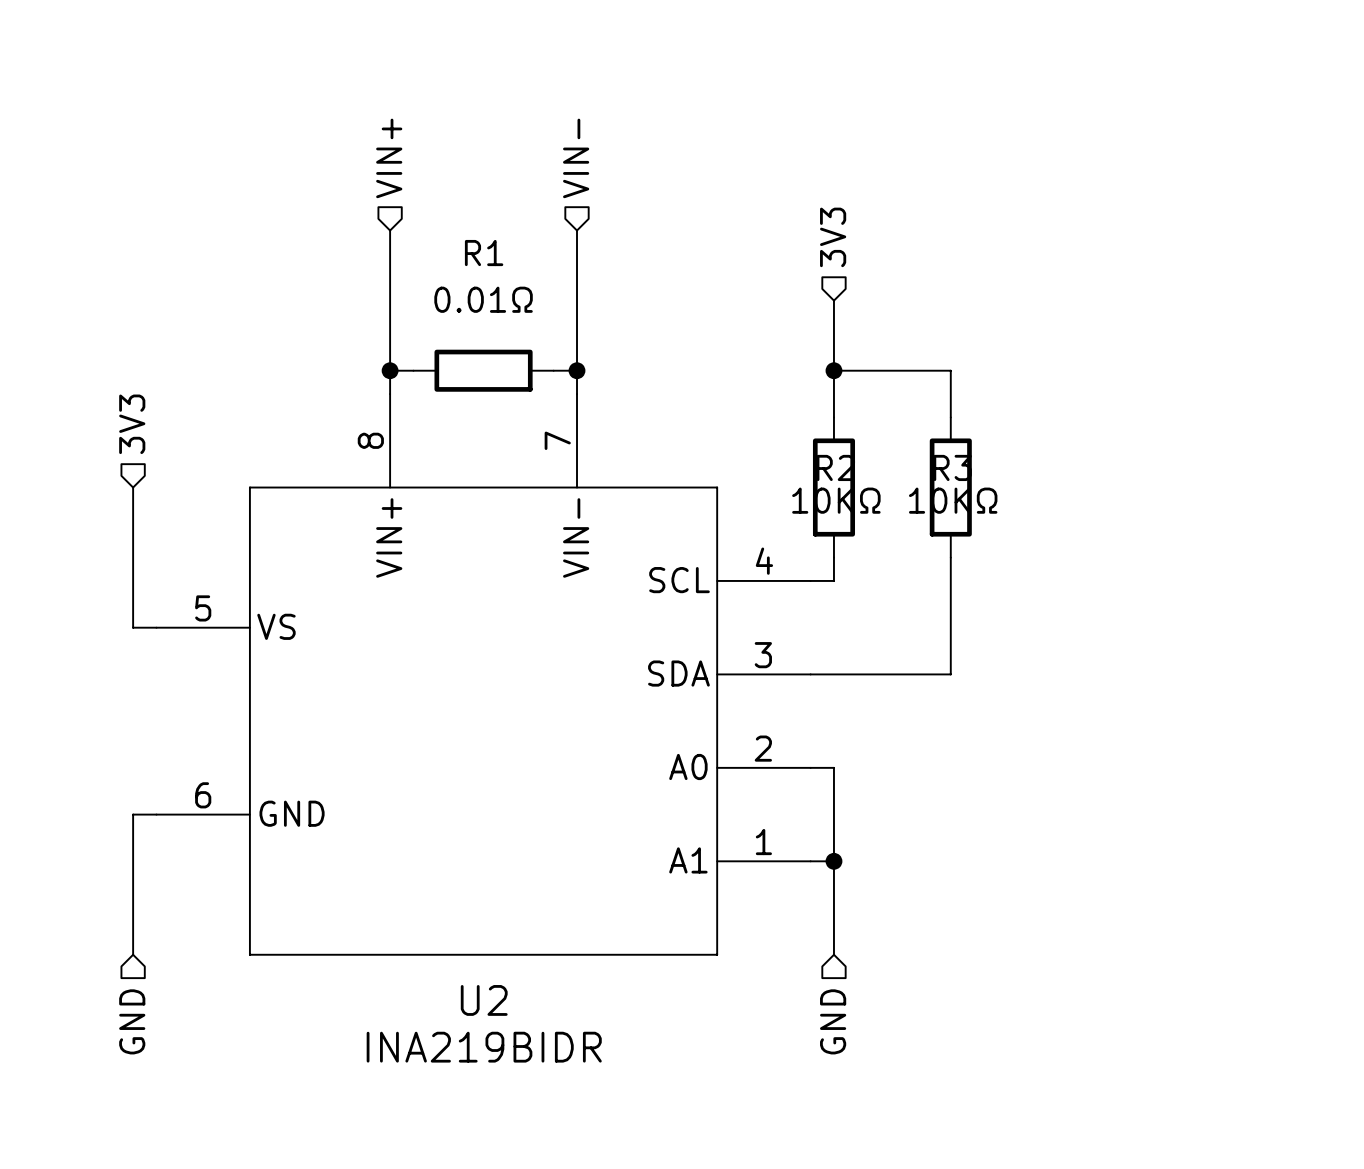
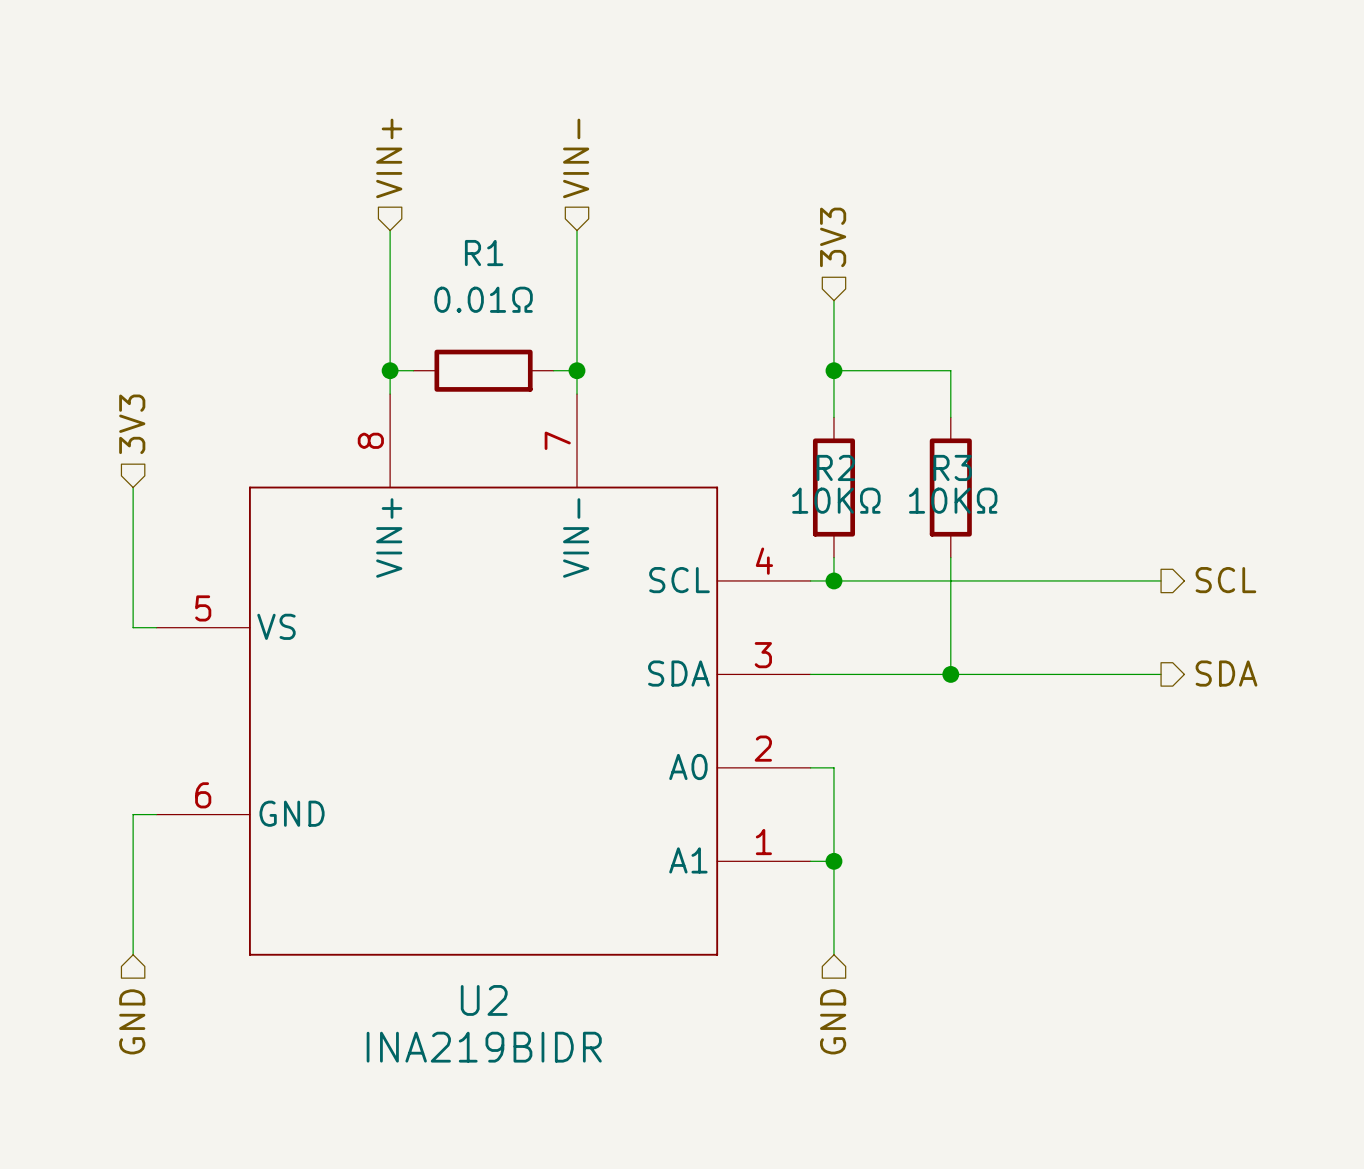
wire: none -> (833, 580) (1161, 580)
junction: none -> (833, 580)
hierarchical label: none -> SCL (1225, 580)
hierarchical label: none -> SDA (1226, 673)
wire: none -> (950, 674) (1161, 674)
junction: none -> (950, 674)

